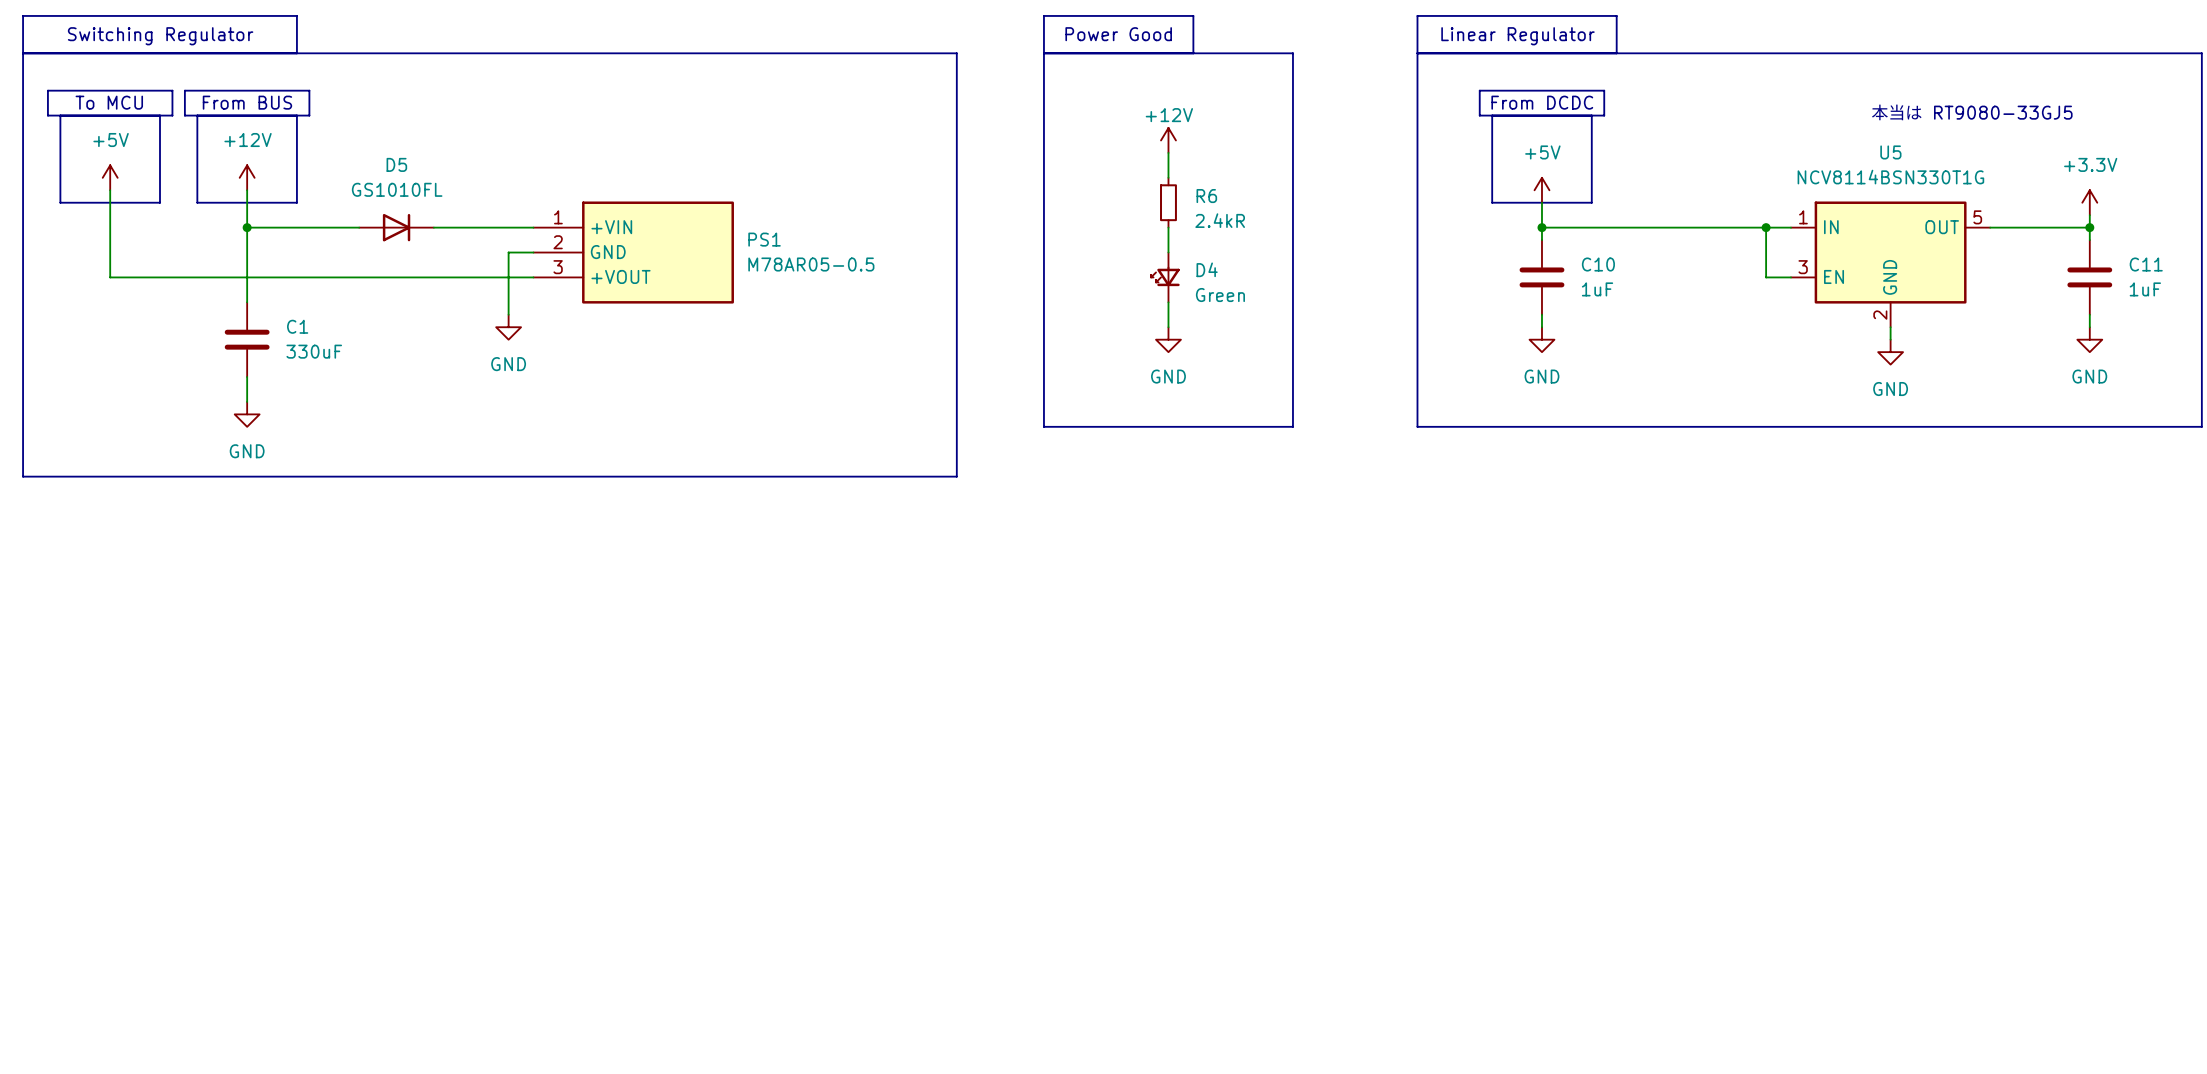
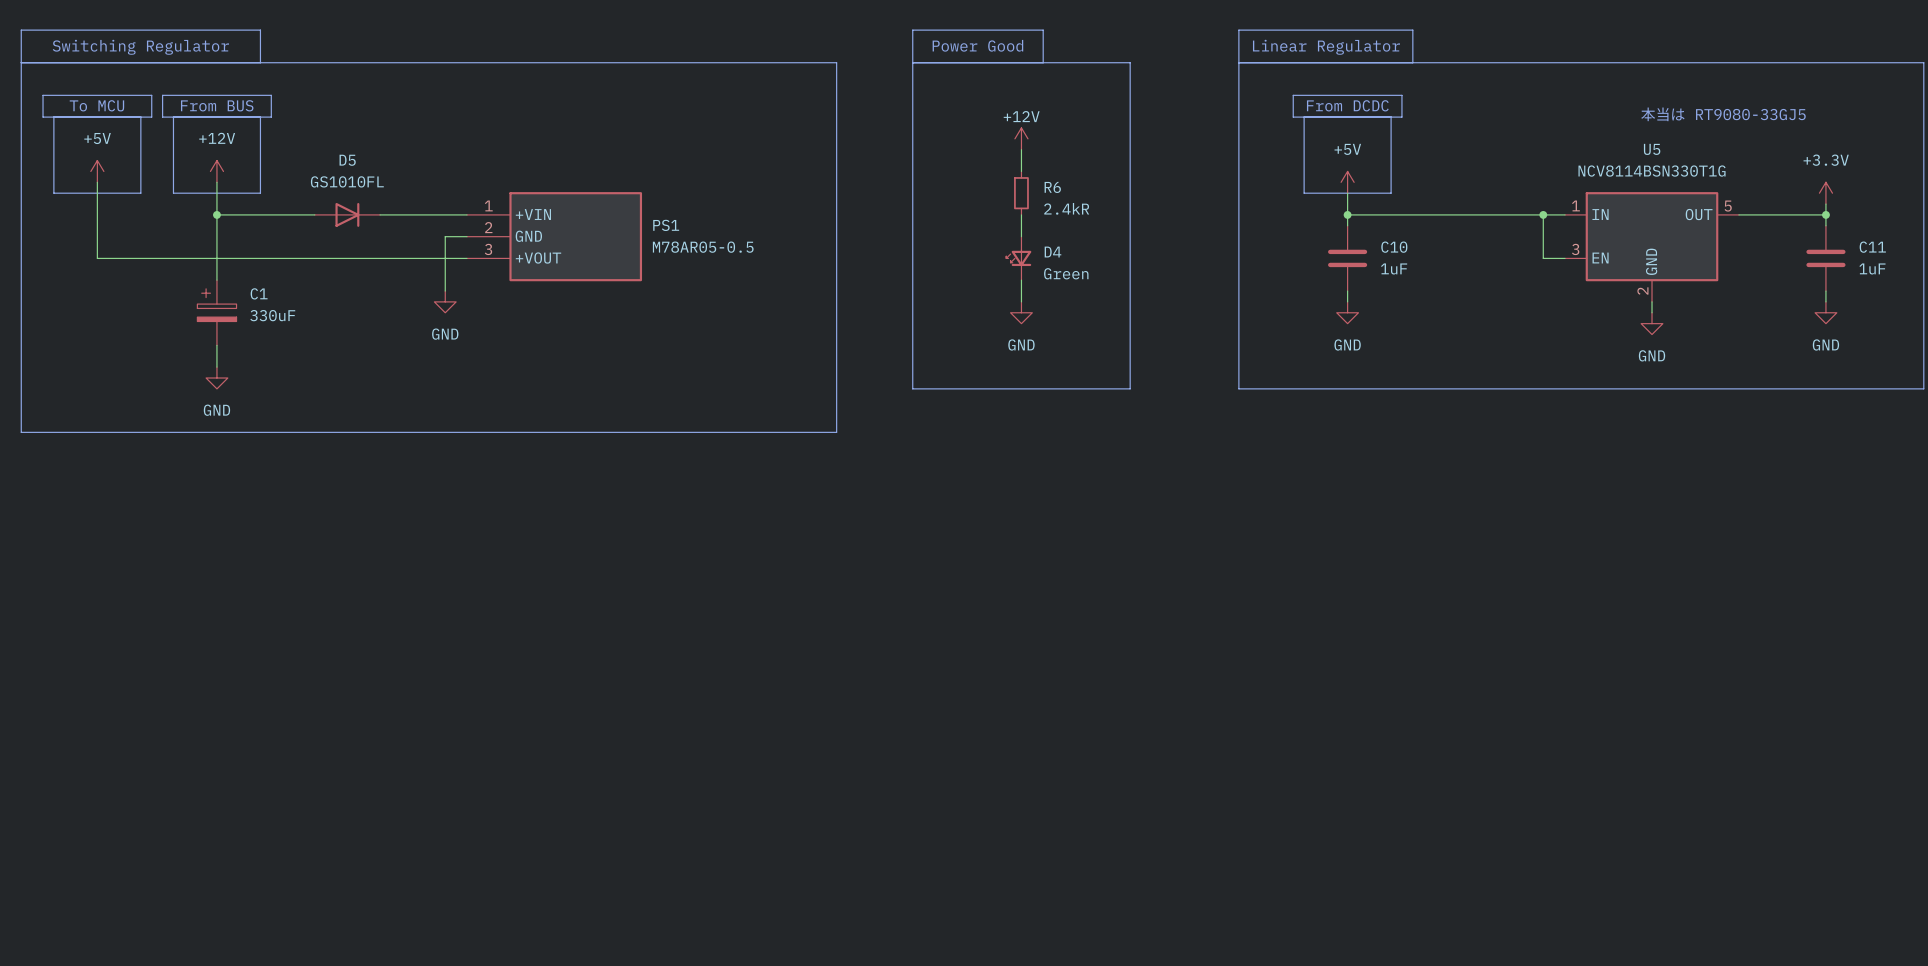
C1 symbol: [224, 302, 270, 378] -> [197, 280, 237, 346]

